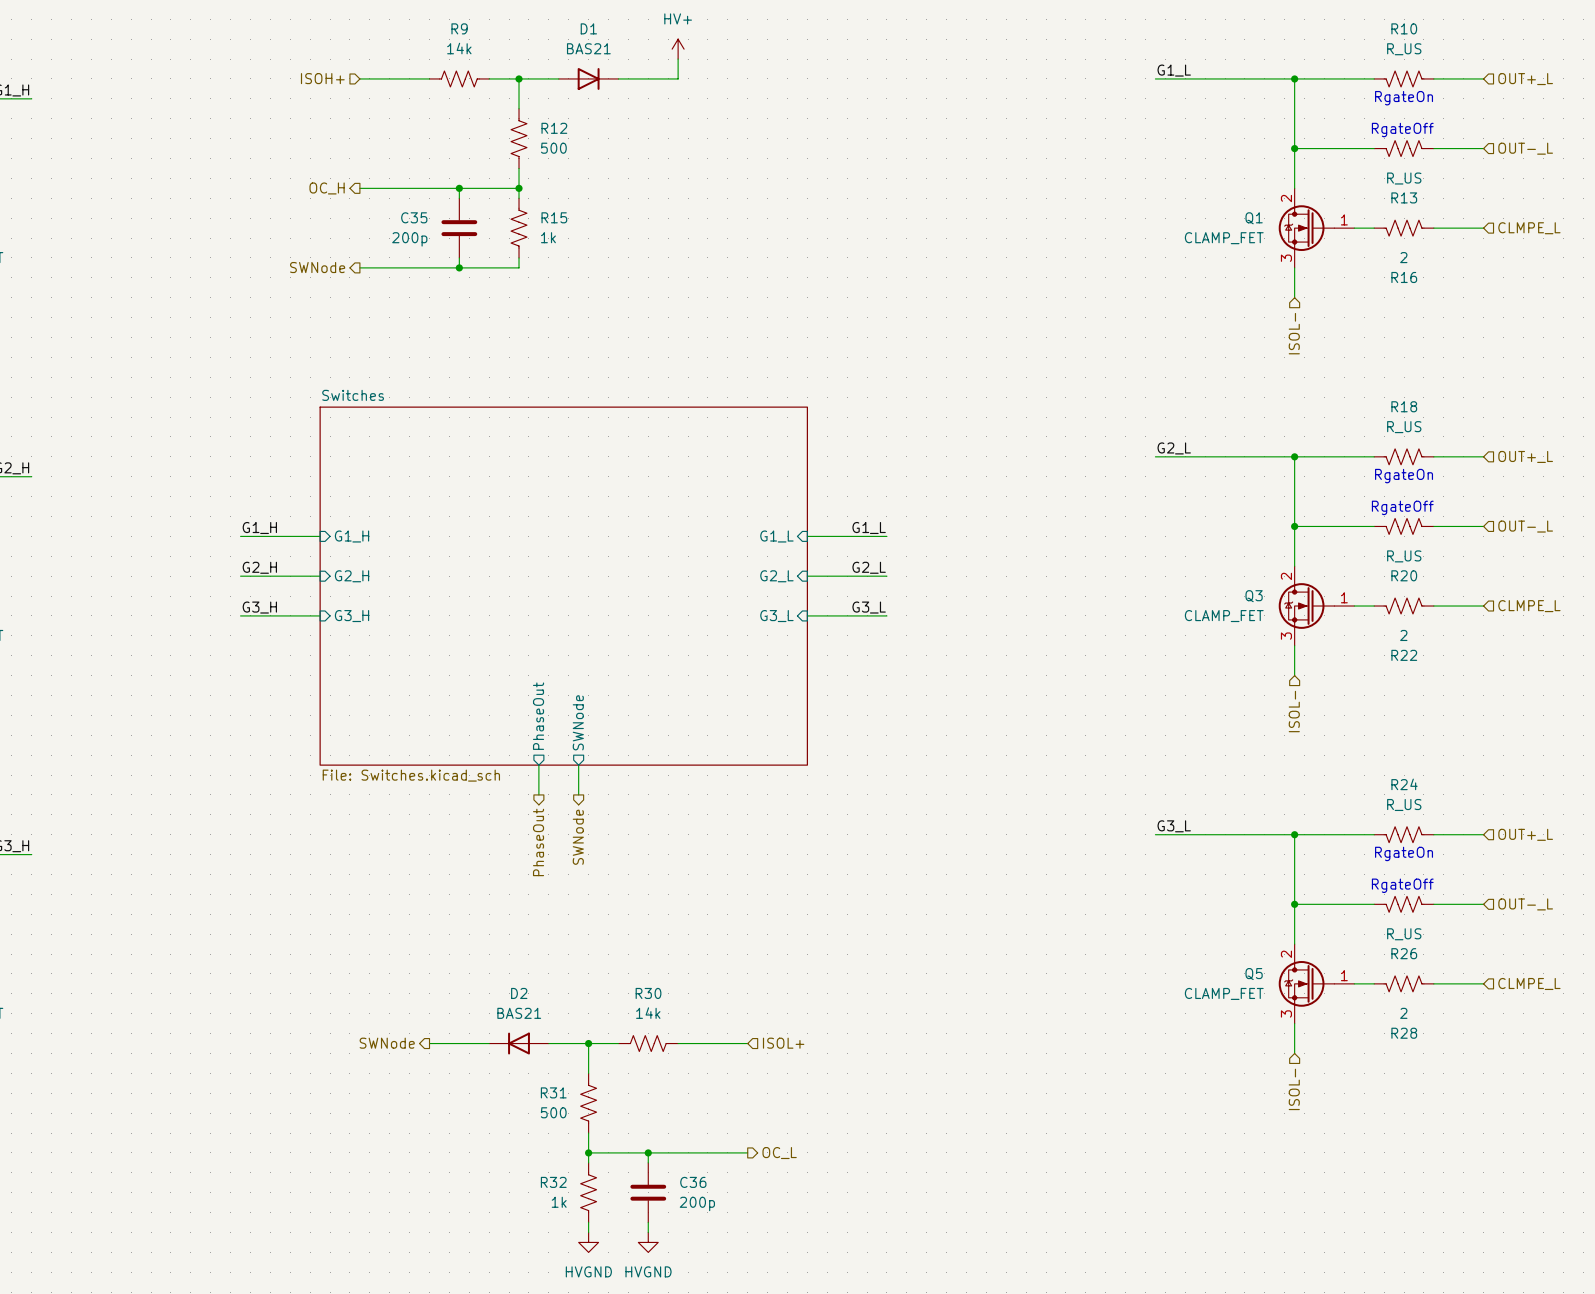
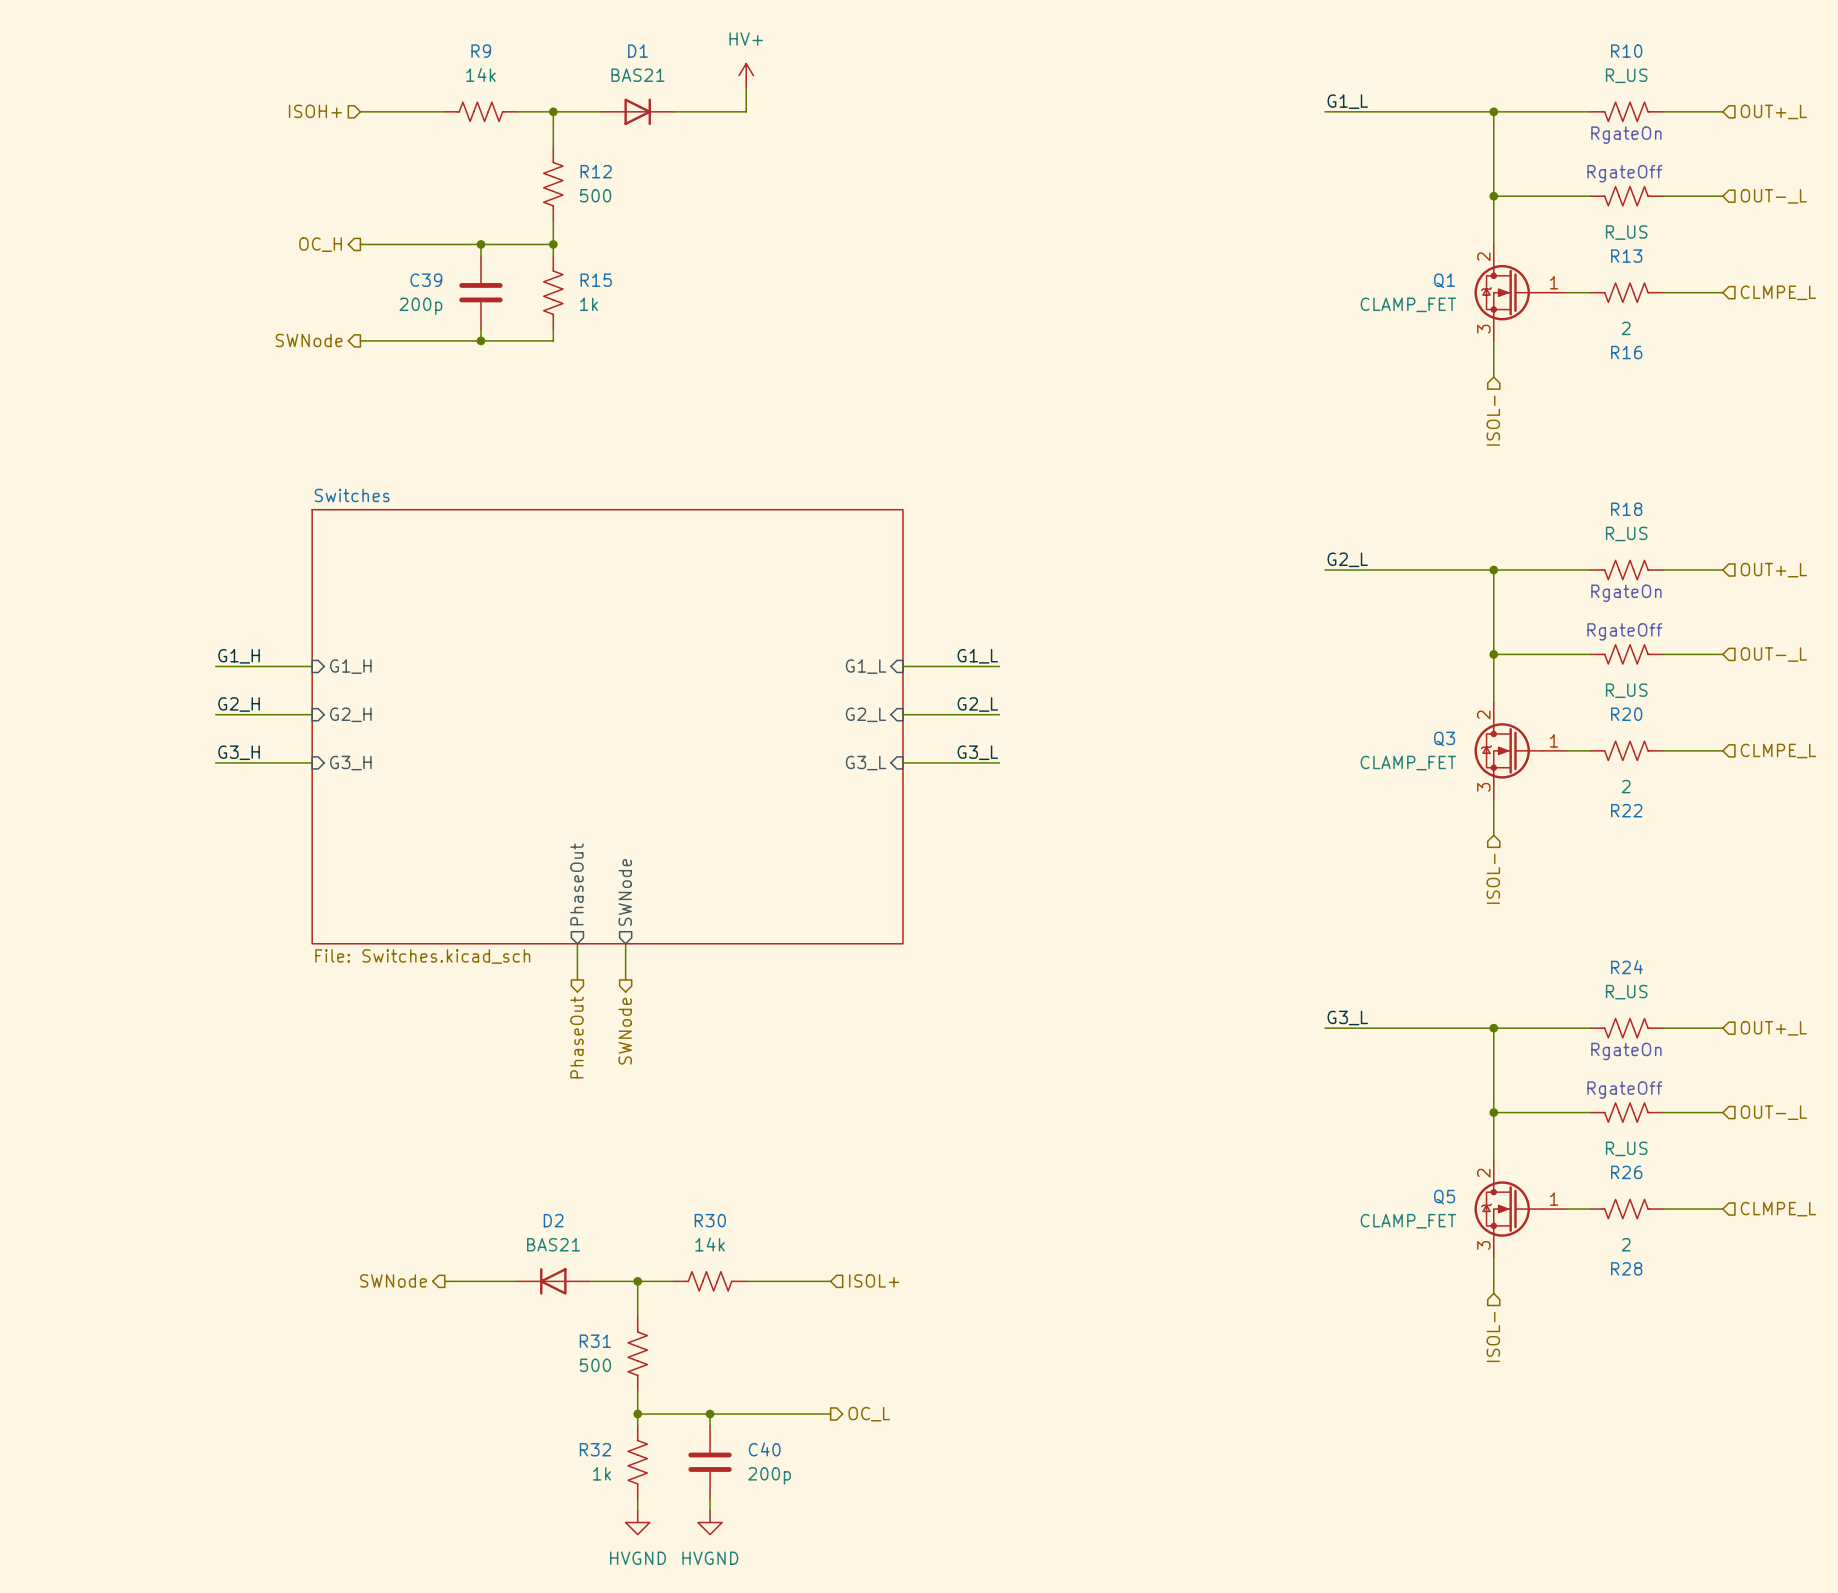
C35 name: C35 (414, 217) -> C39 (426, 280)
C36 name: C36 (693, 1182) -> C40 (764, 1449)

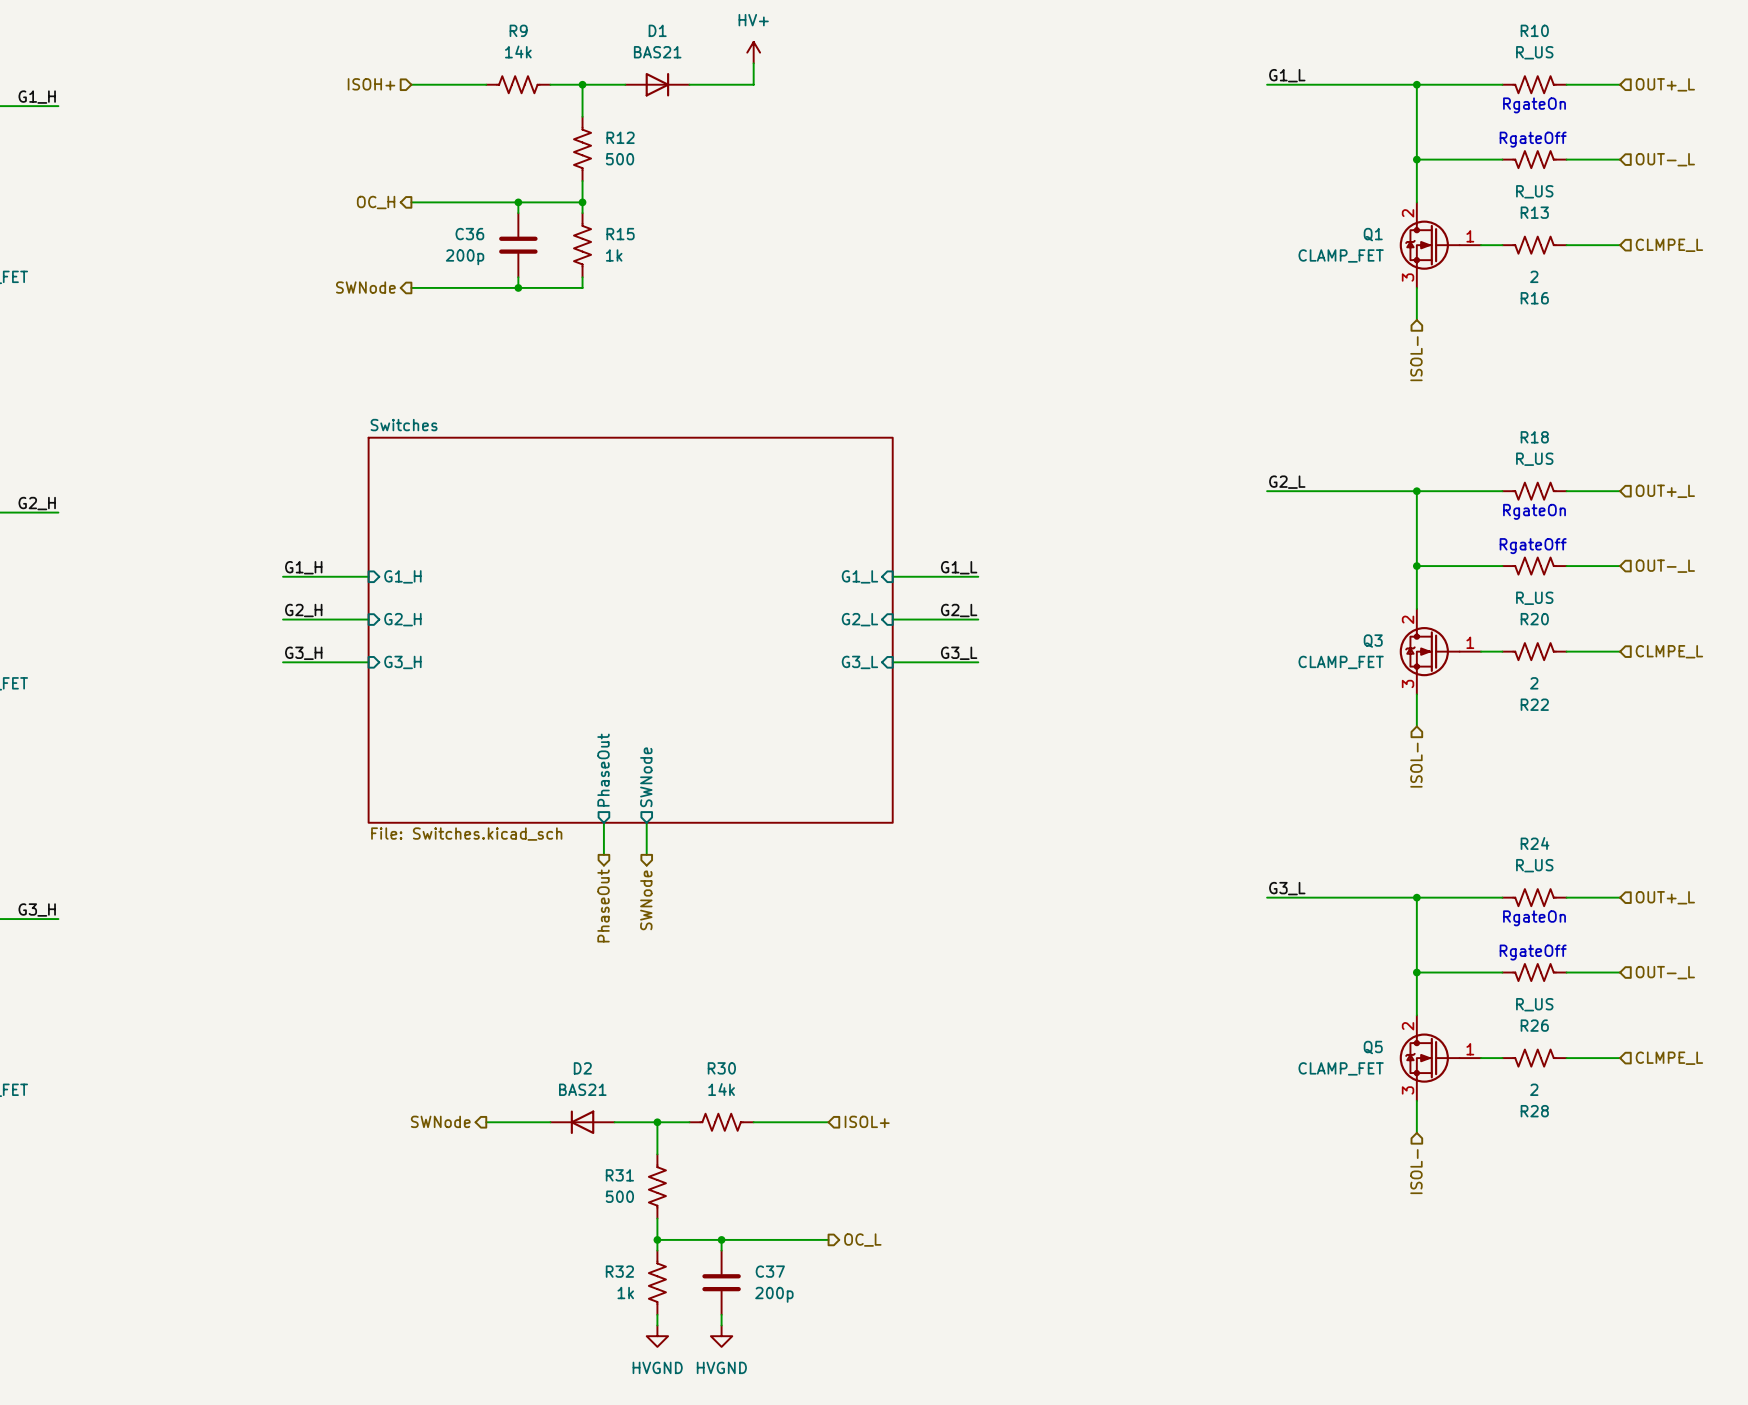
C39 name: C39 (426, 280) -> C36 (469, 234)
C40 name: C40 (764, 1449) -> C37 (770, 1271)

